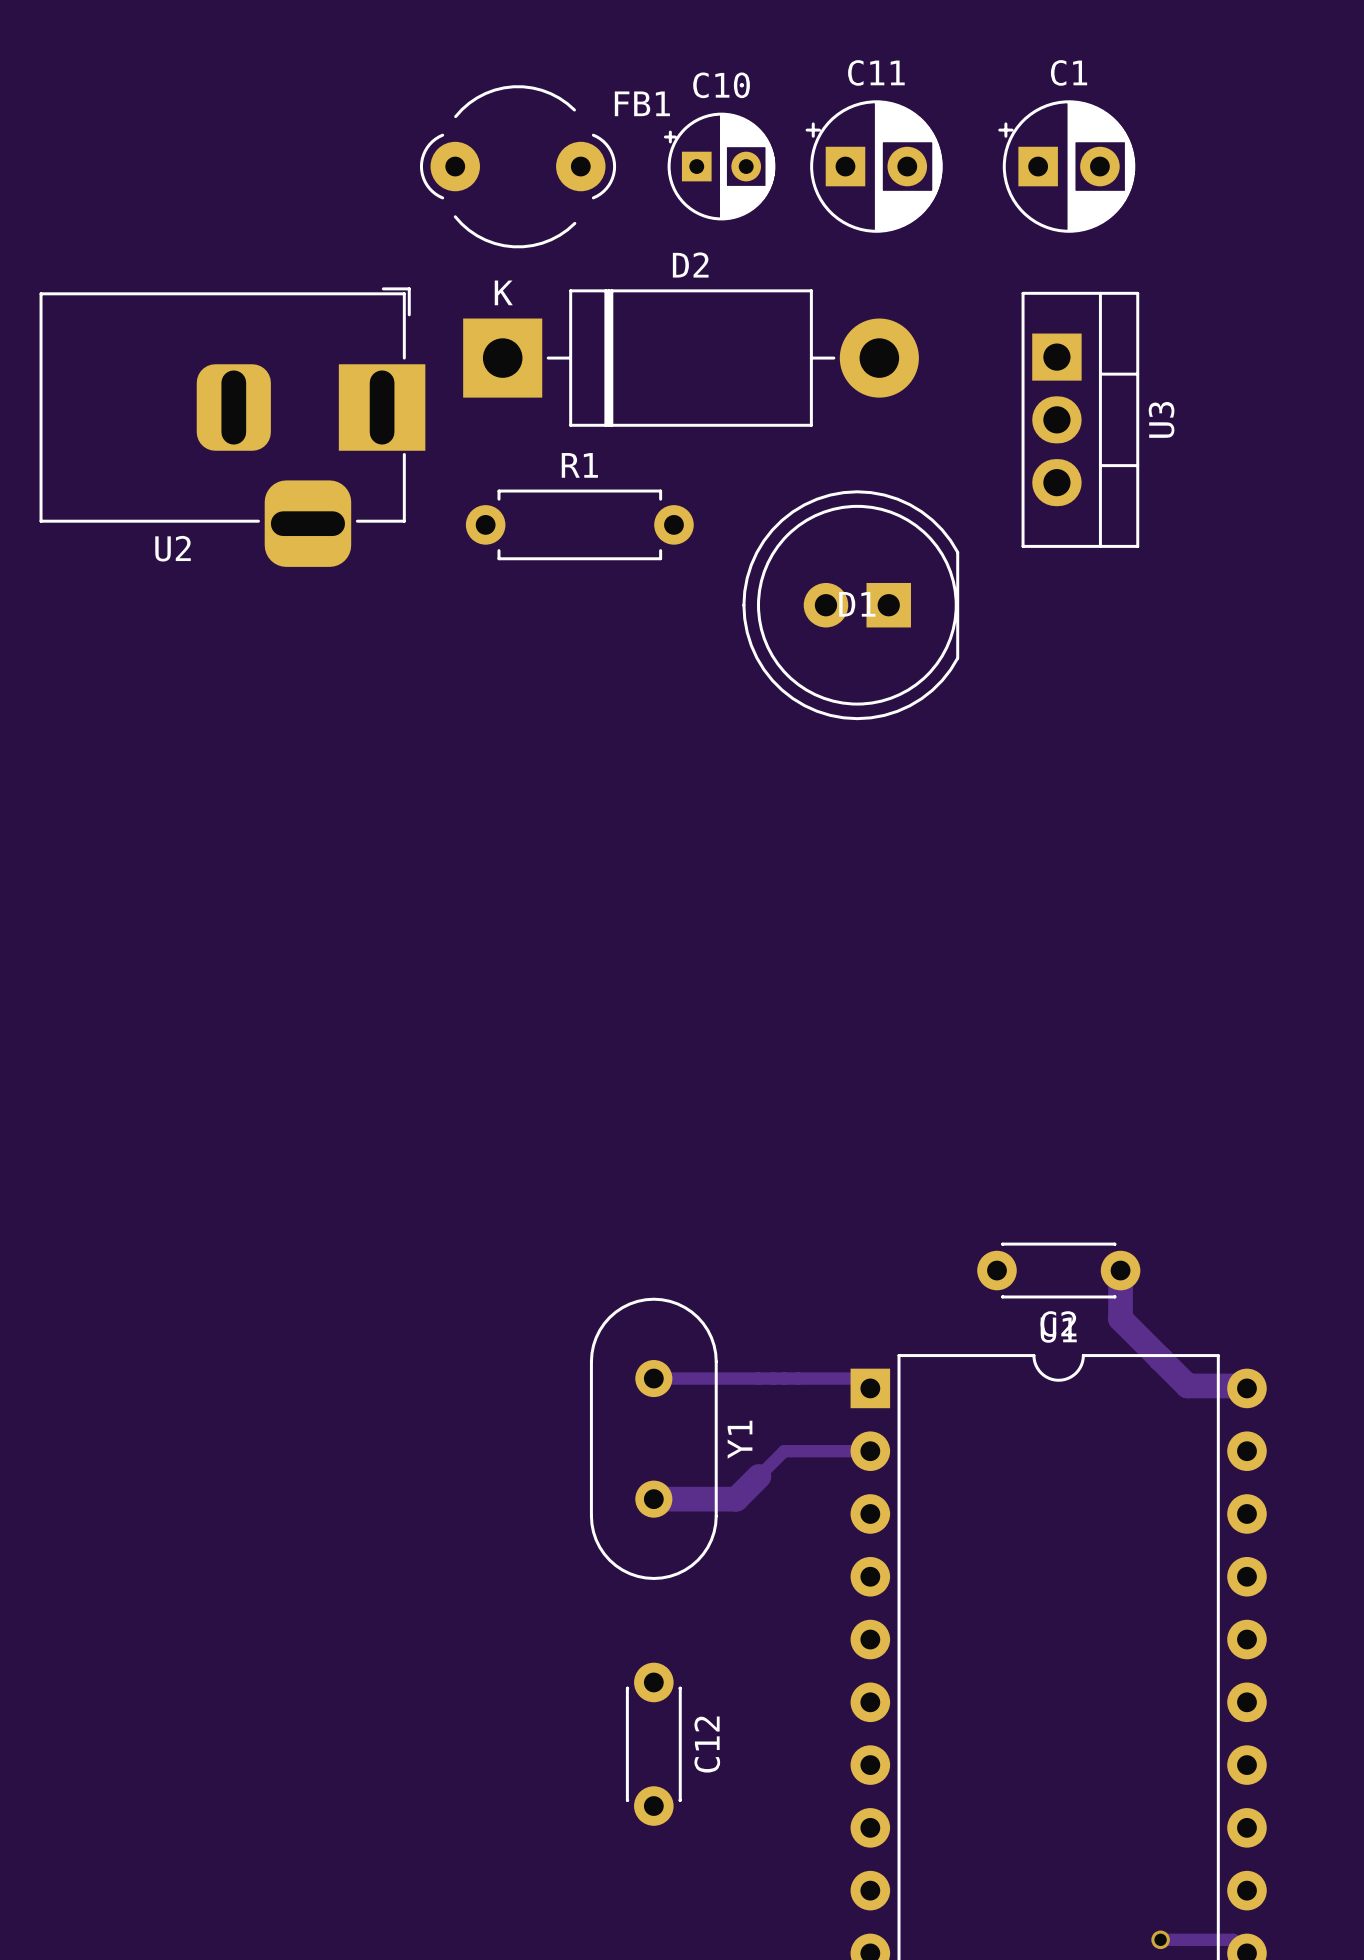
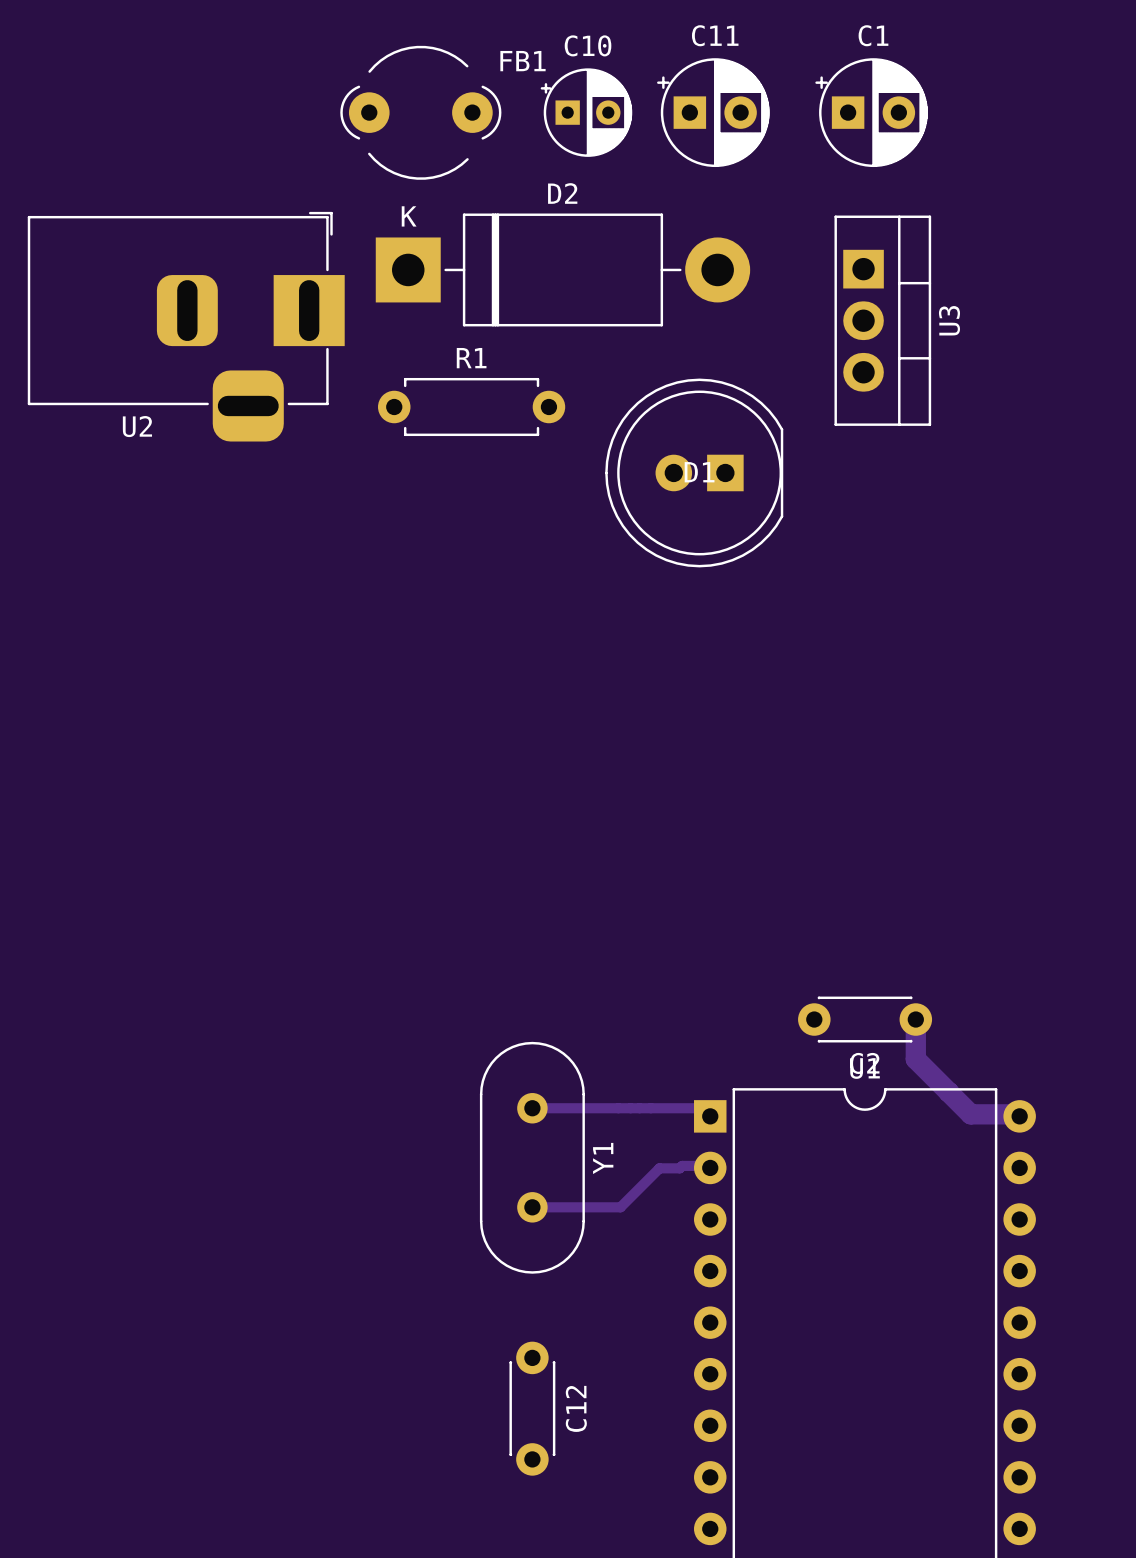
track: (870, 1451) (784, 1451) (736, 1499) -> (710, 1165) (659, 1168) (620, 1207) (600, 1207)
track width: thick (653, 1499) (736, 1499) -> thin (532, 1207) (600, 1207)

